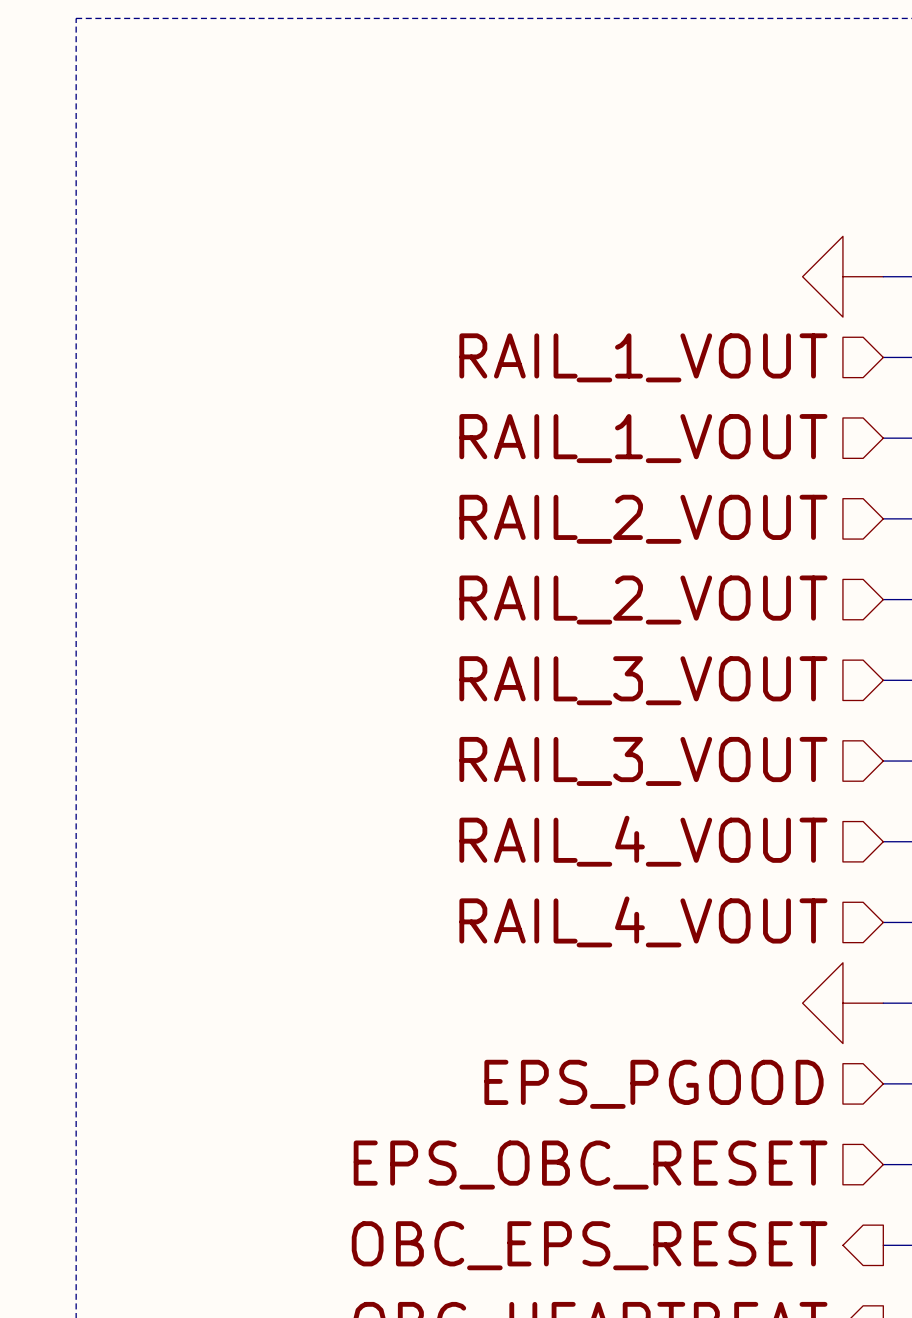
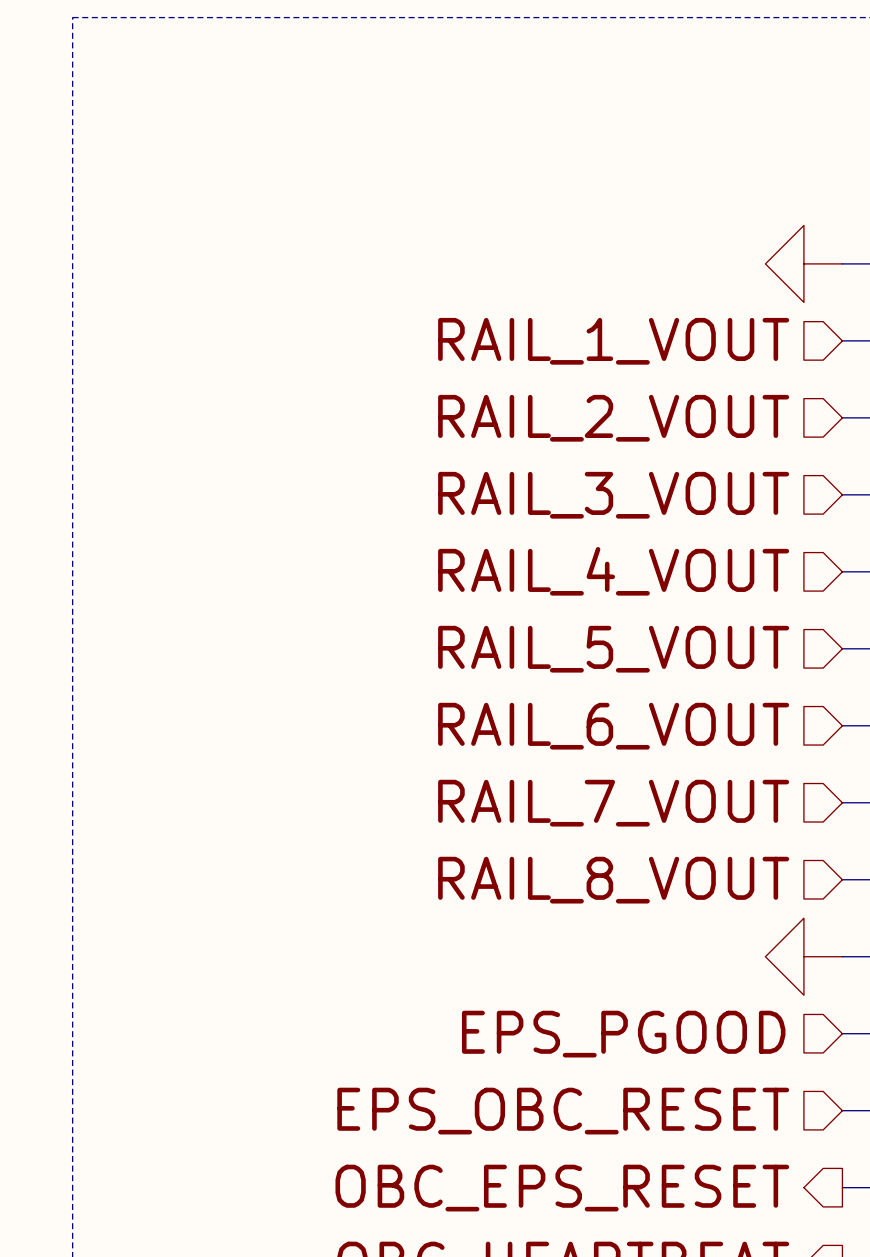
hierarchical label: RAIL_1_VOUT (643, 438) -> RAIL_2_VOUT (613, 418)
hierarchical label: RAIL_2_VOUT (643, 519) -> RAIL_3_VOUT (613, 495)
hierarchical label: RAIL_2_VOUT (643, 600) -> RAIL_4_VOUT (613, 571)
hierarchical label: RAIL_3_VOUT (643, 680) -> RAIL_5_VOUT (613, 649)
hierarchical label: RAIL_3_VOUT (643, 761) -> RAIL_6_VOUT (613, 726)
hierarchical label: RAIL_4_VOUT (643, 841) -> RAIL_7_VOUT (613, 803)
hierarchical label: RAIL_4_VOUT (643, 921) -> RAIL_8_VOUT (613, 880)

